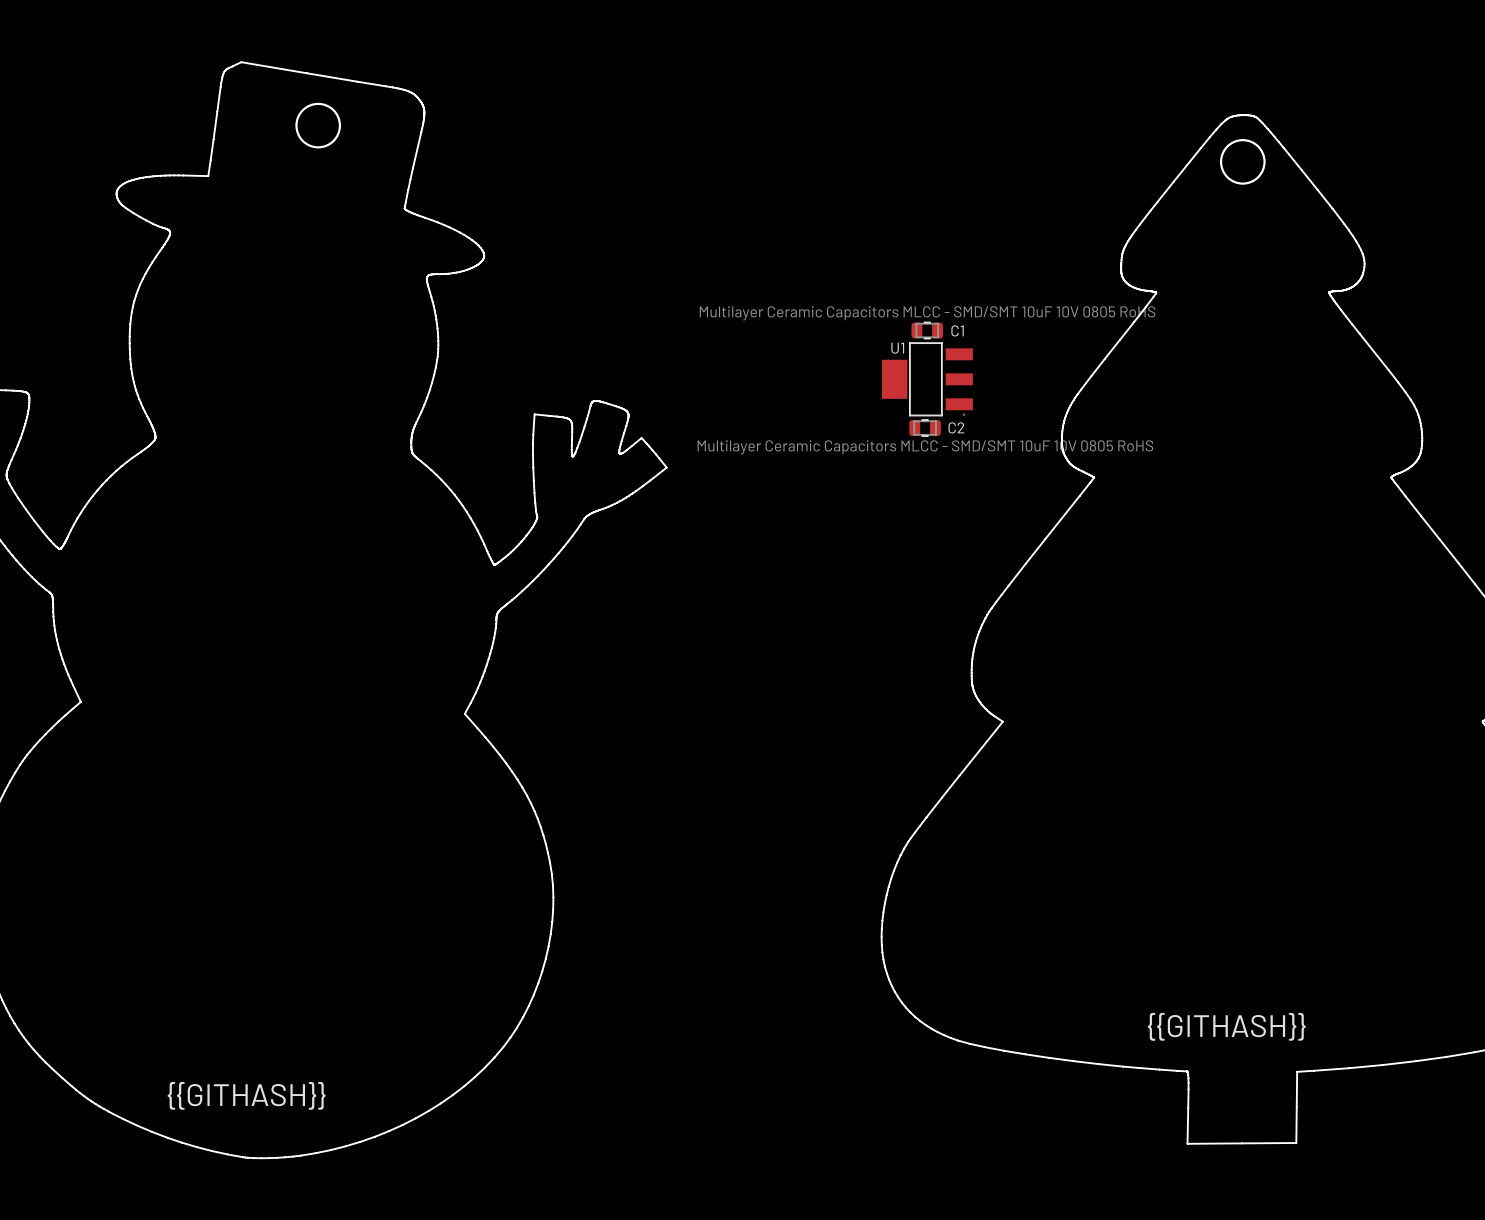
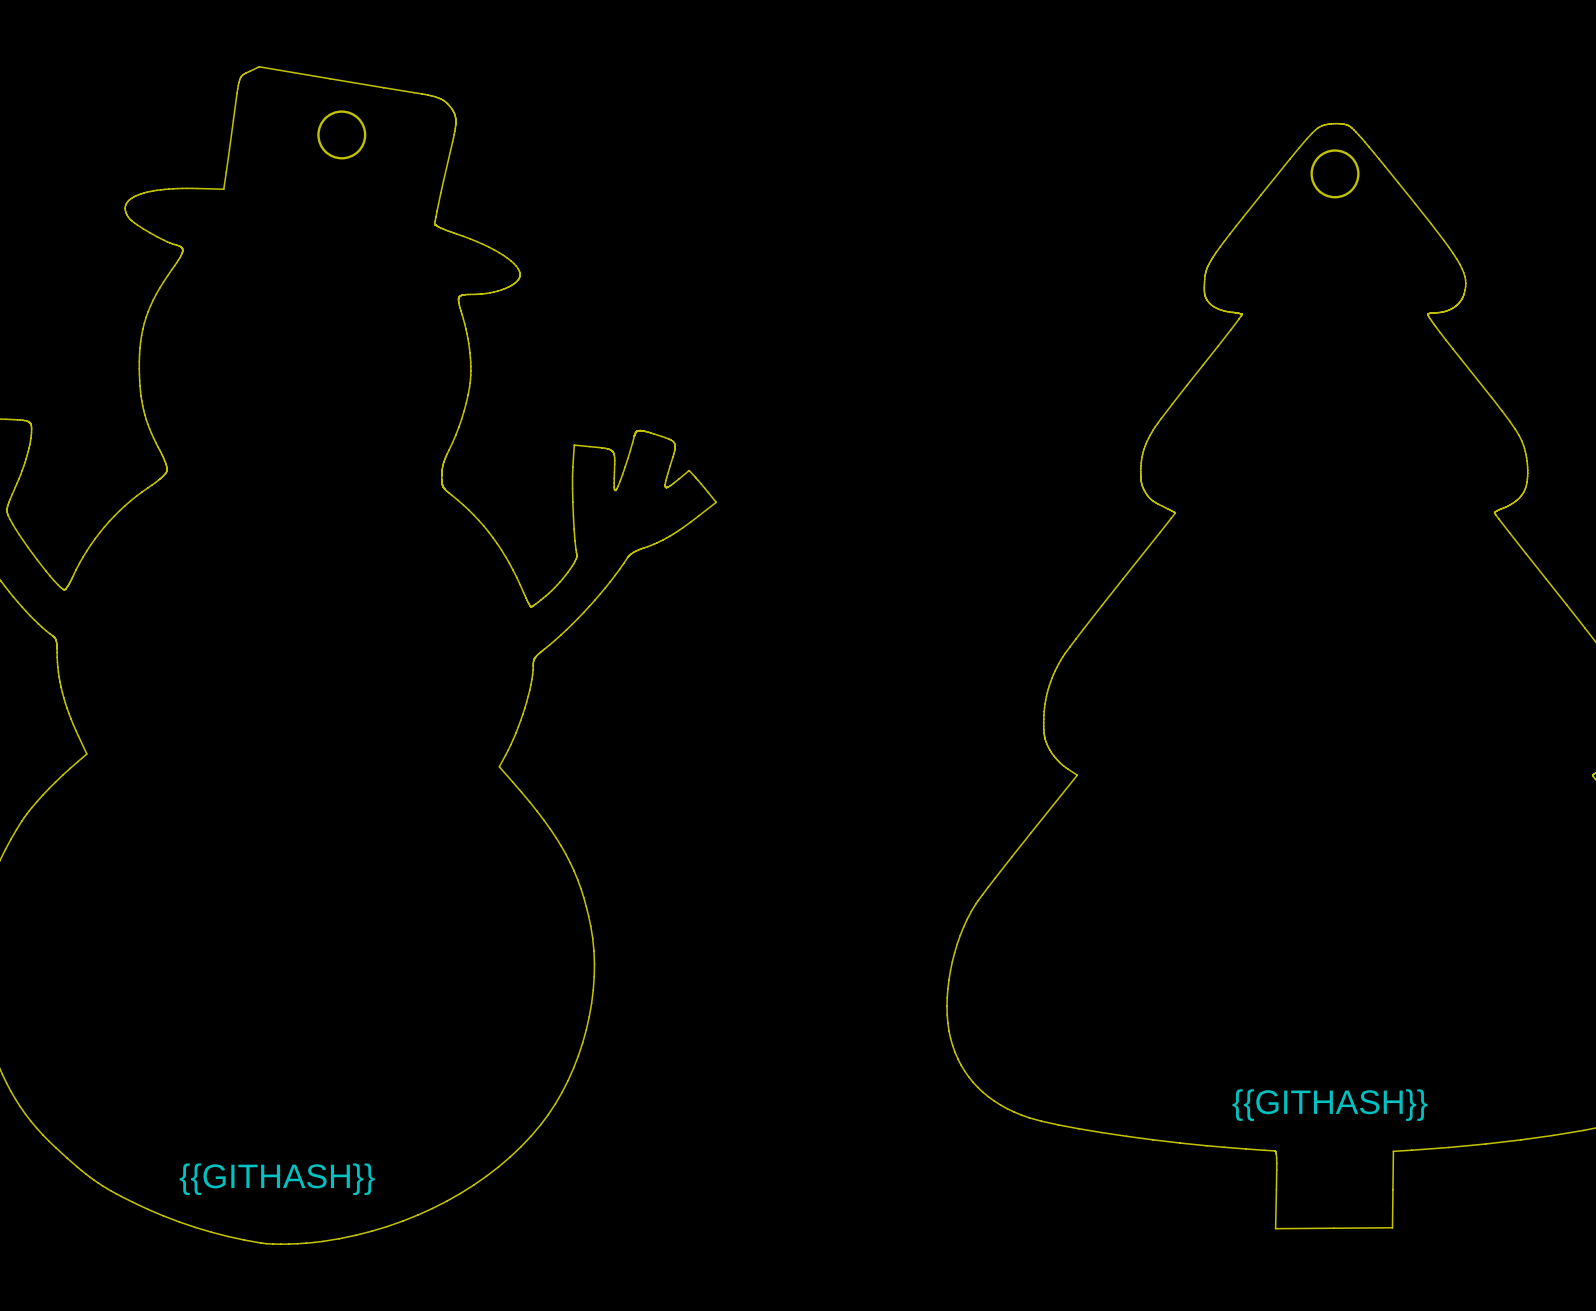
C1: Multilayer Ceramic Capacitors MLCC - SMD/SMT 10uF 10V 0805 RoHS (927, 330) -> none
U1: (927, 379) -> none
C2: Multilayer Ceramic Capacitors MLCC - SMD/SMT 10uF 10V 0805 RoHS (925, 428) -> none

